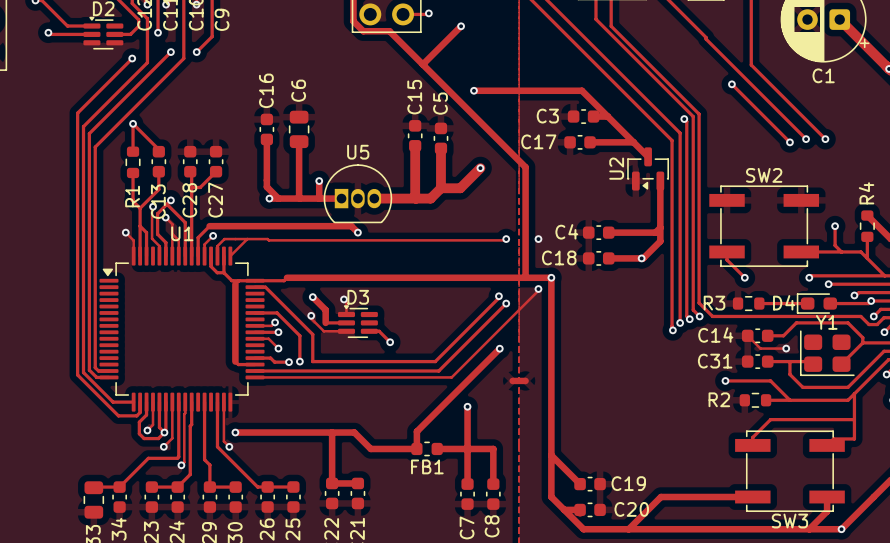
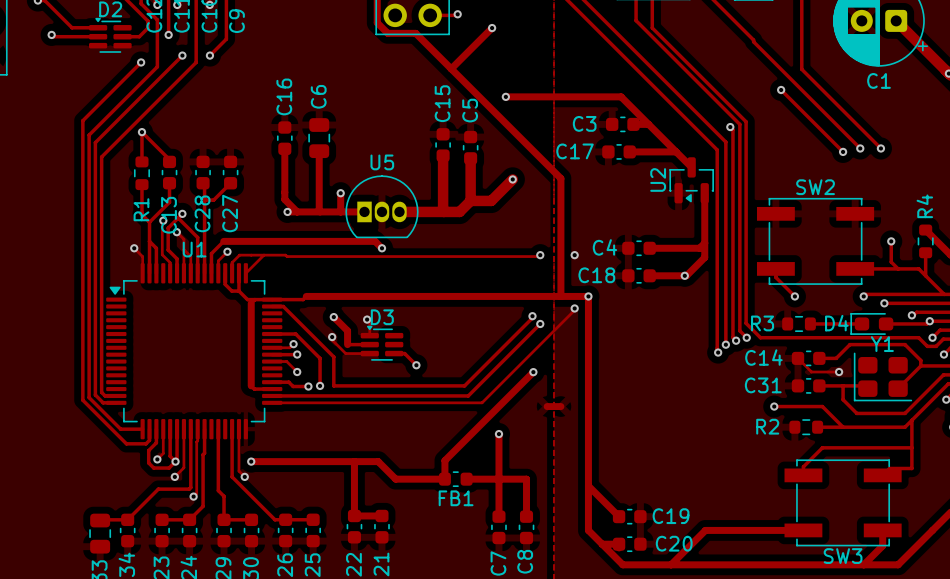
via: (841, 529) -> none

